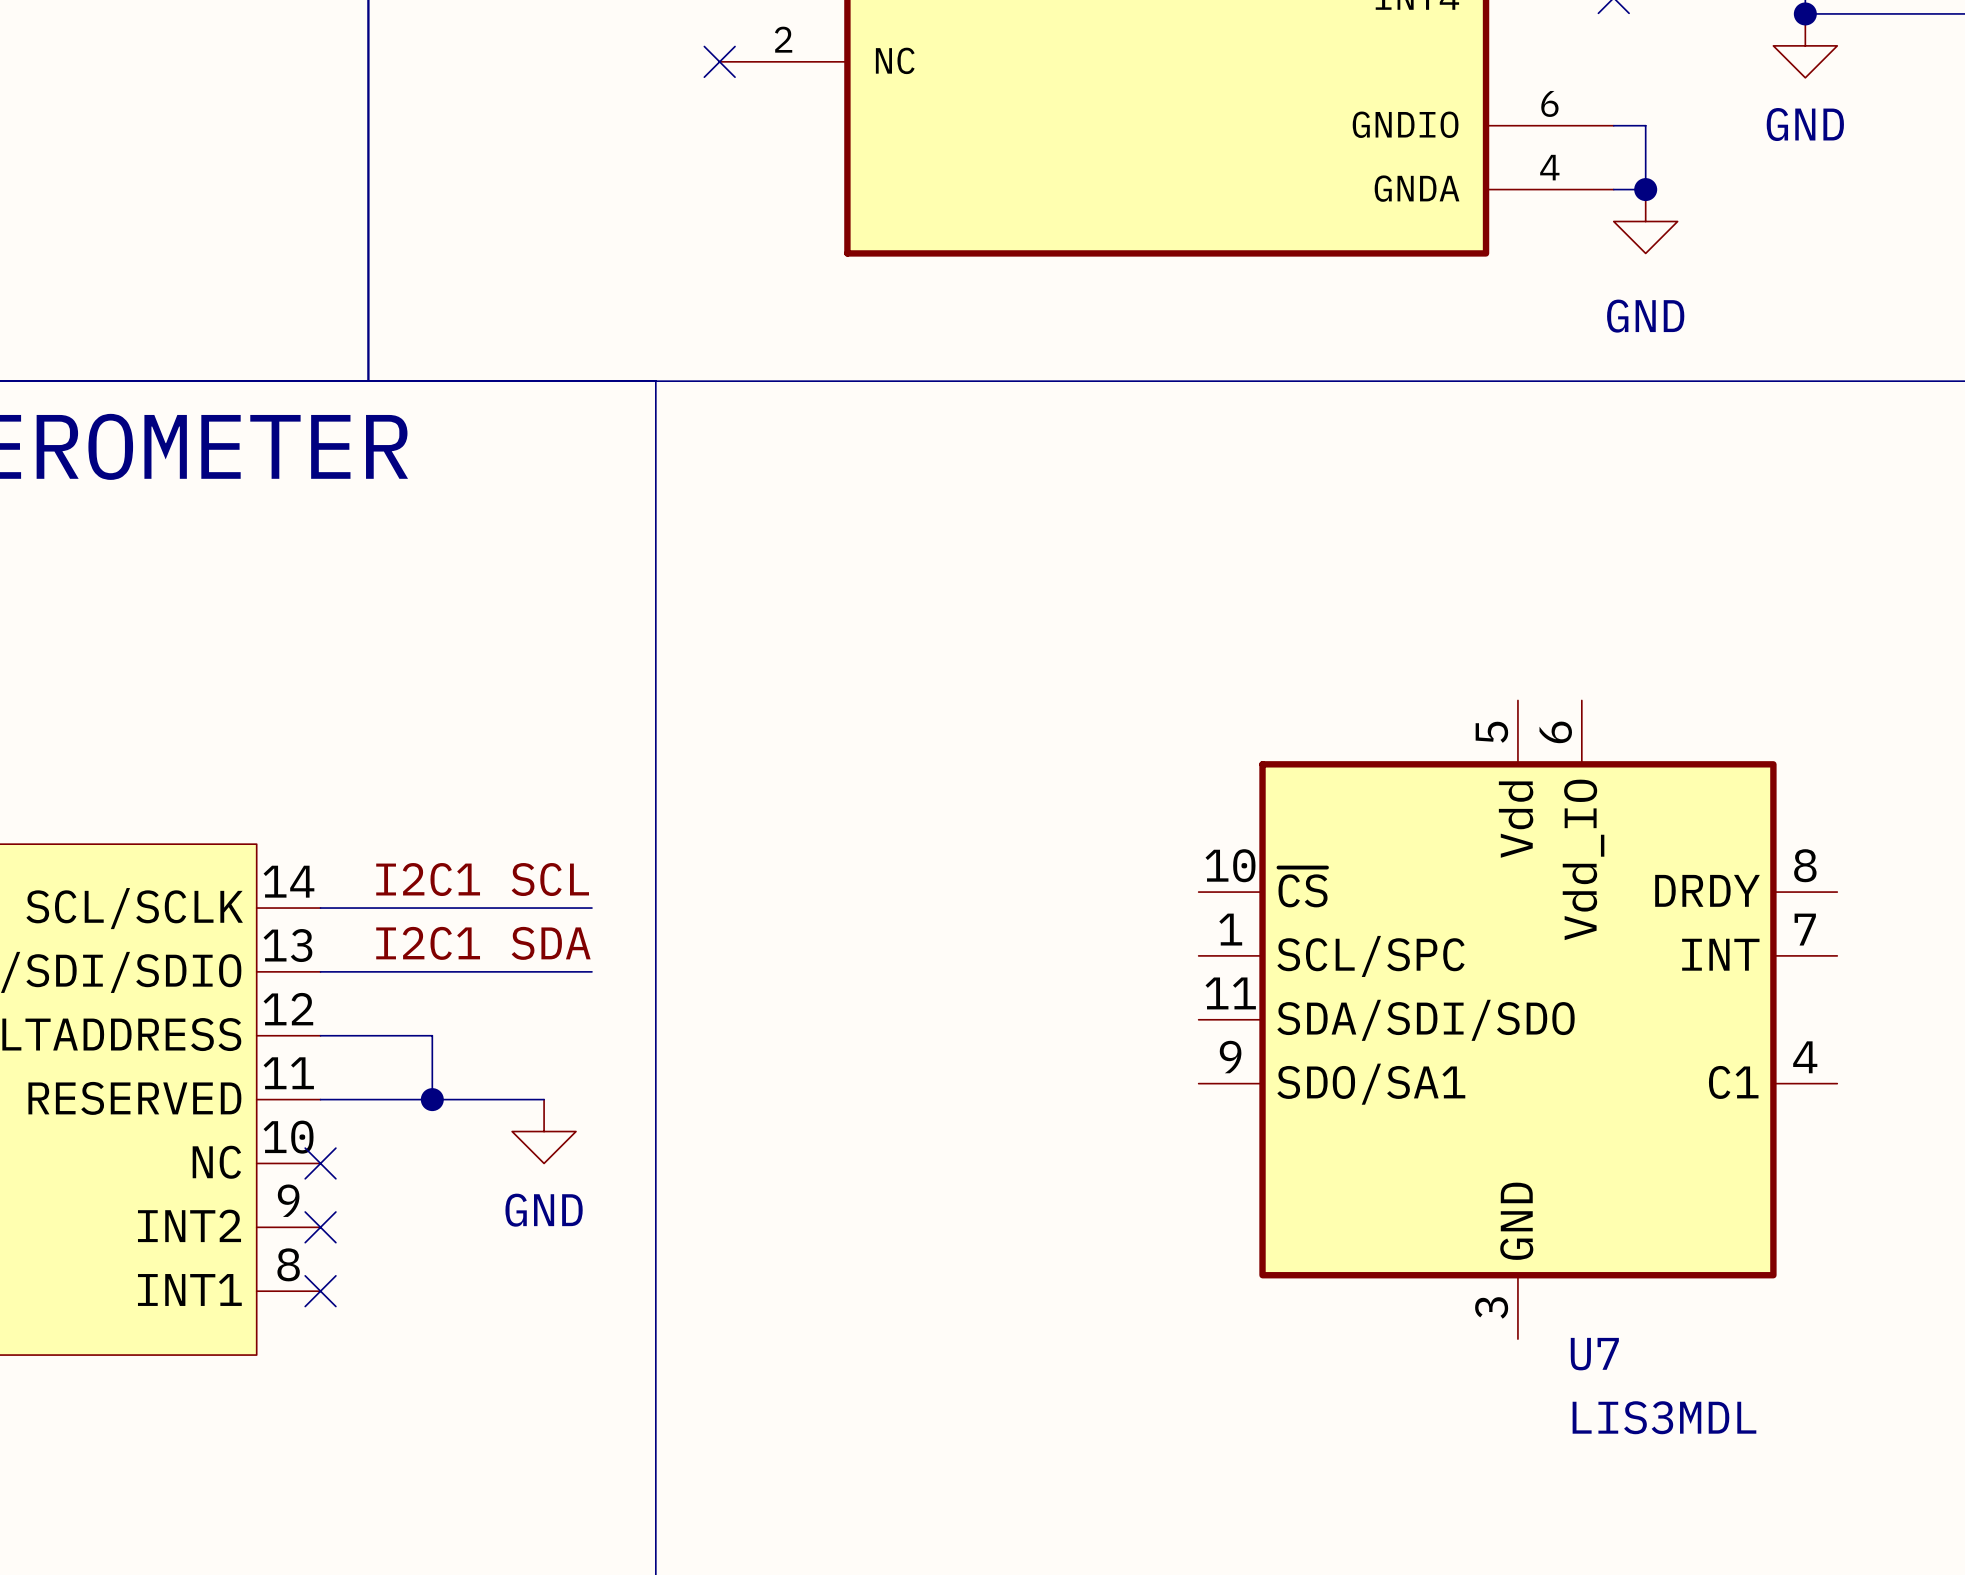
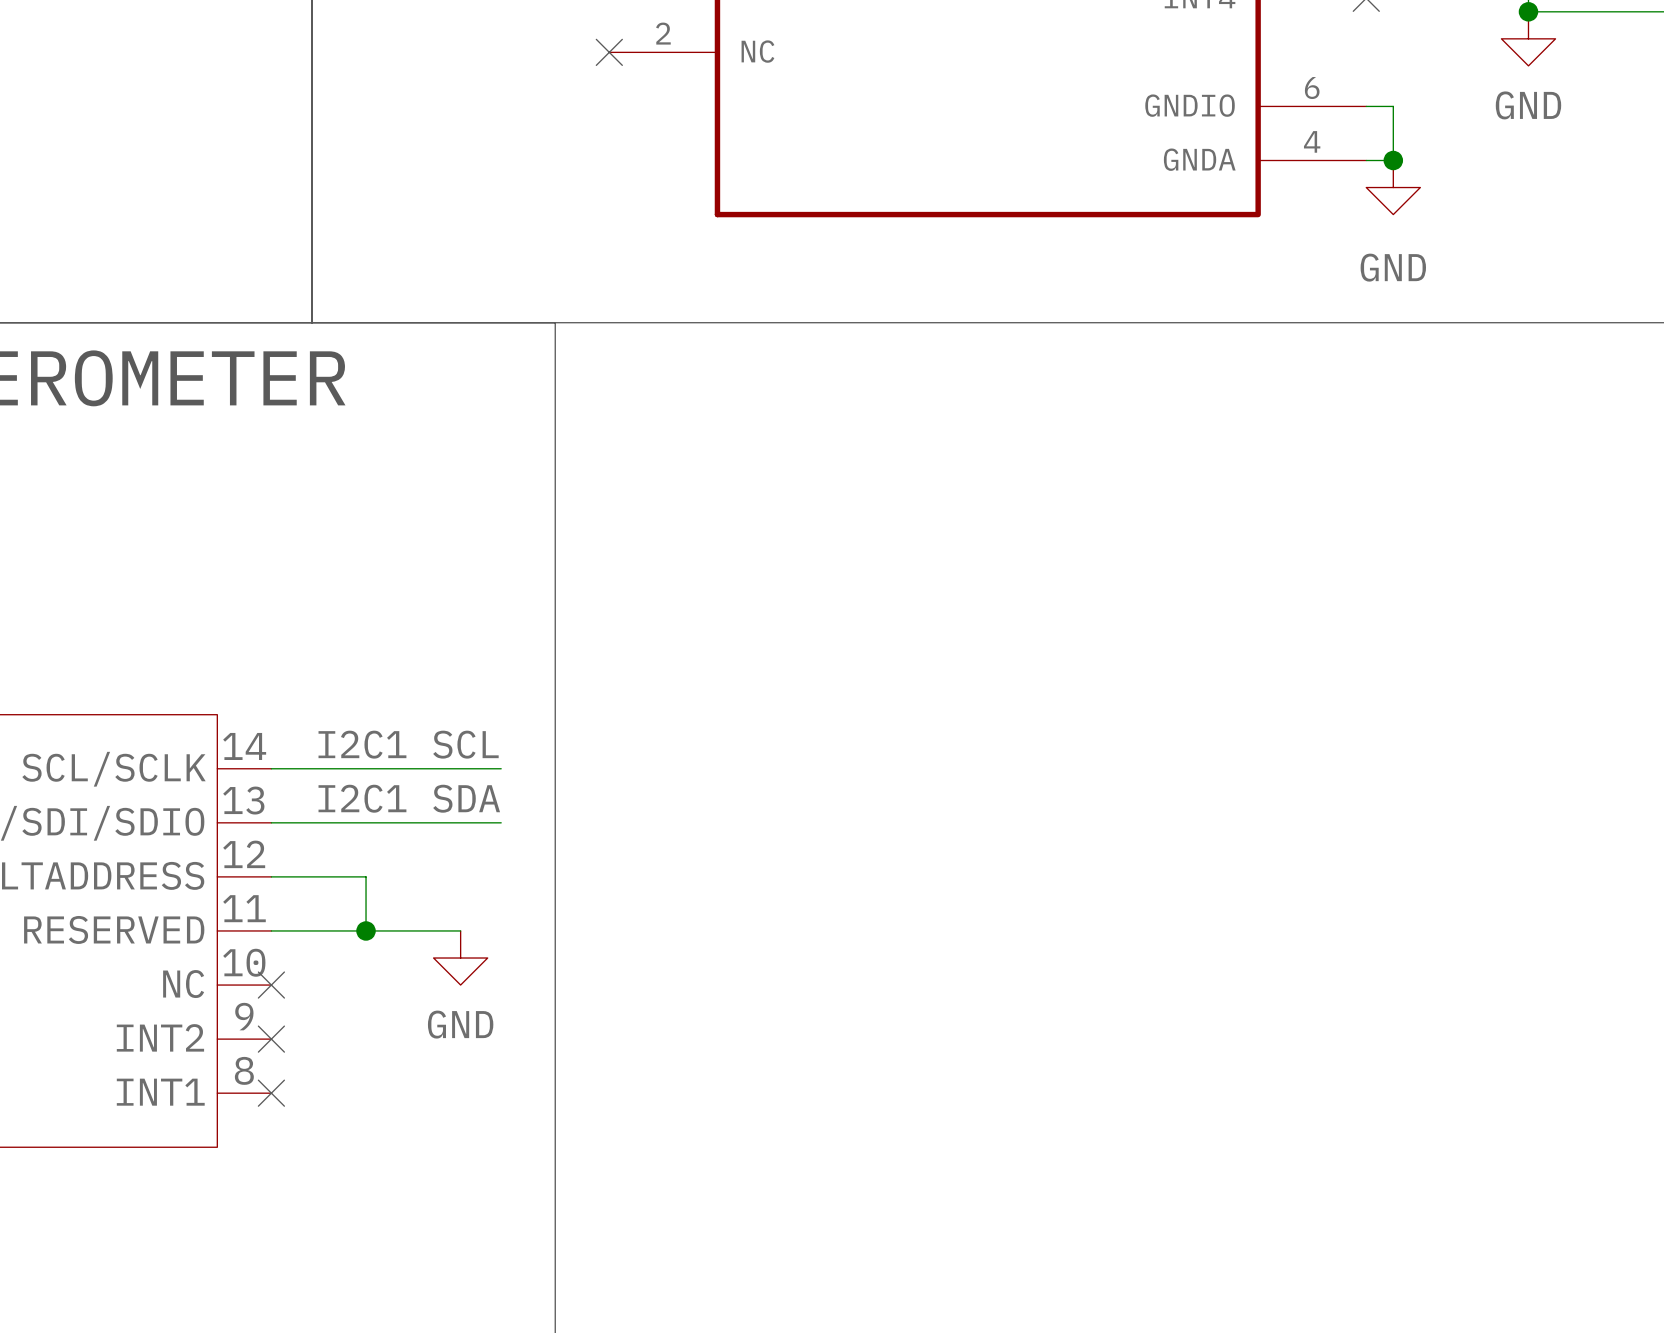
U7: LIS3MDL (1517, 1019) -> none

